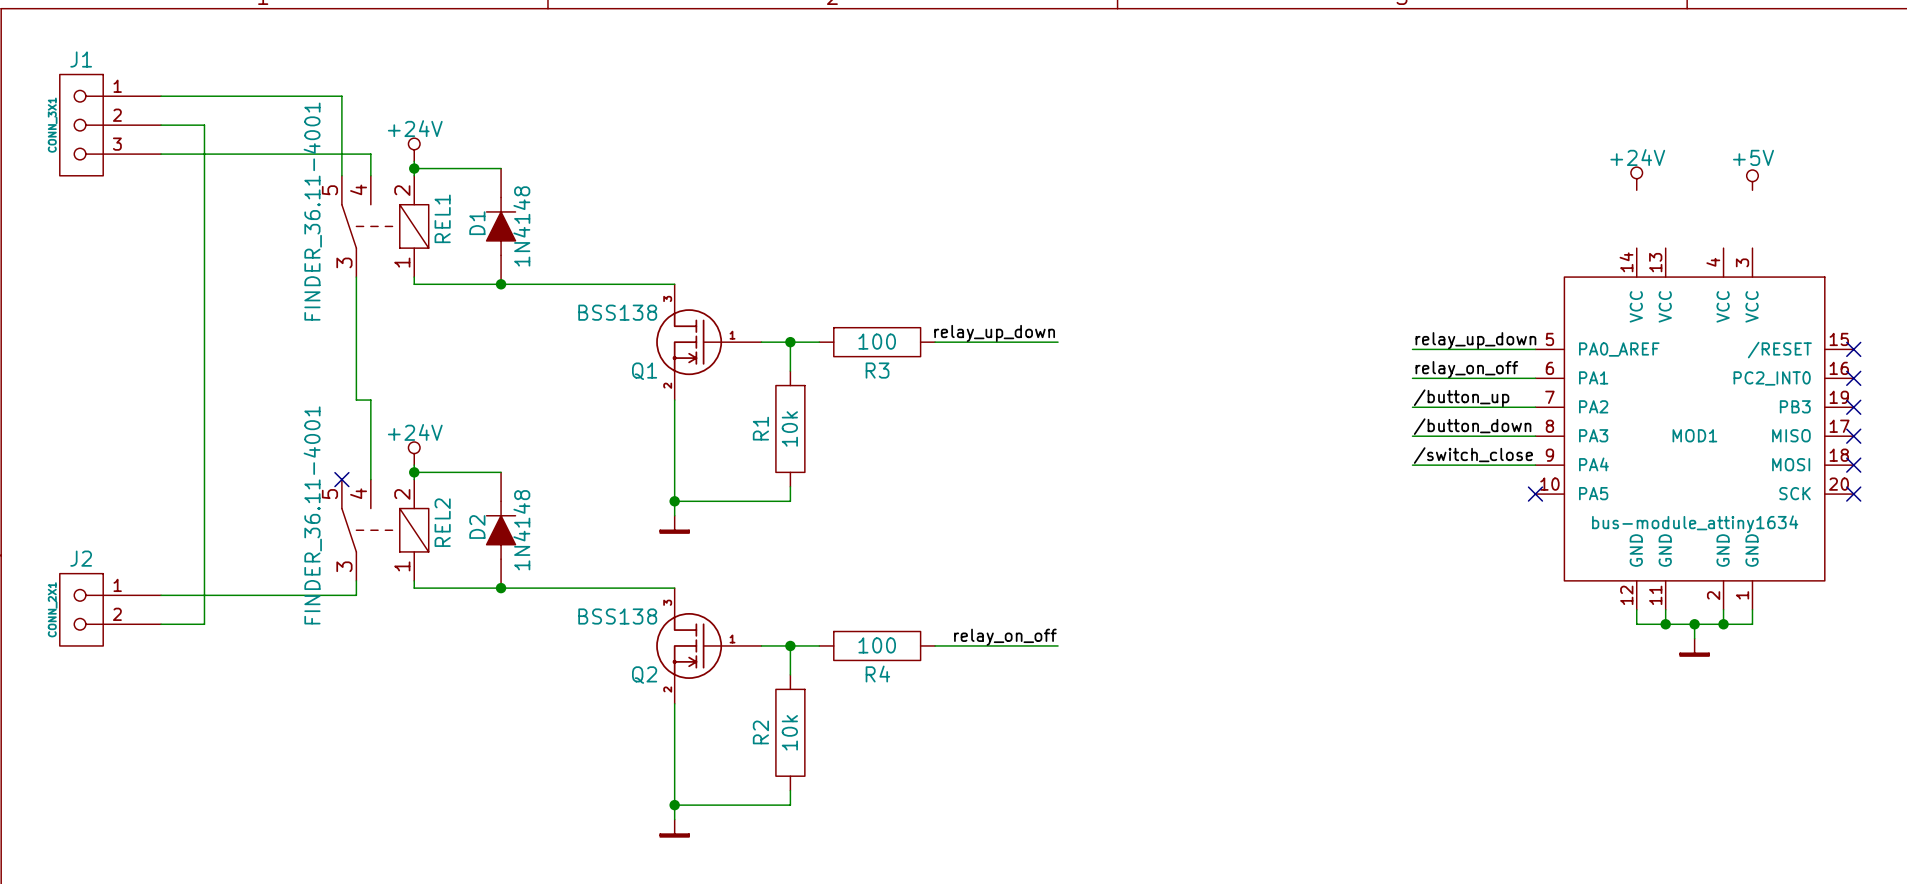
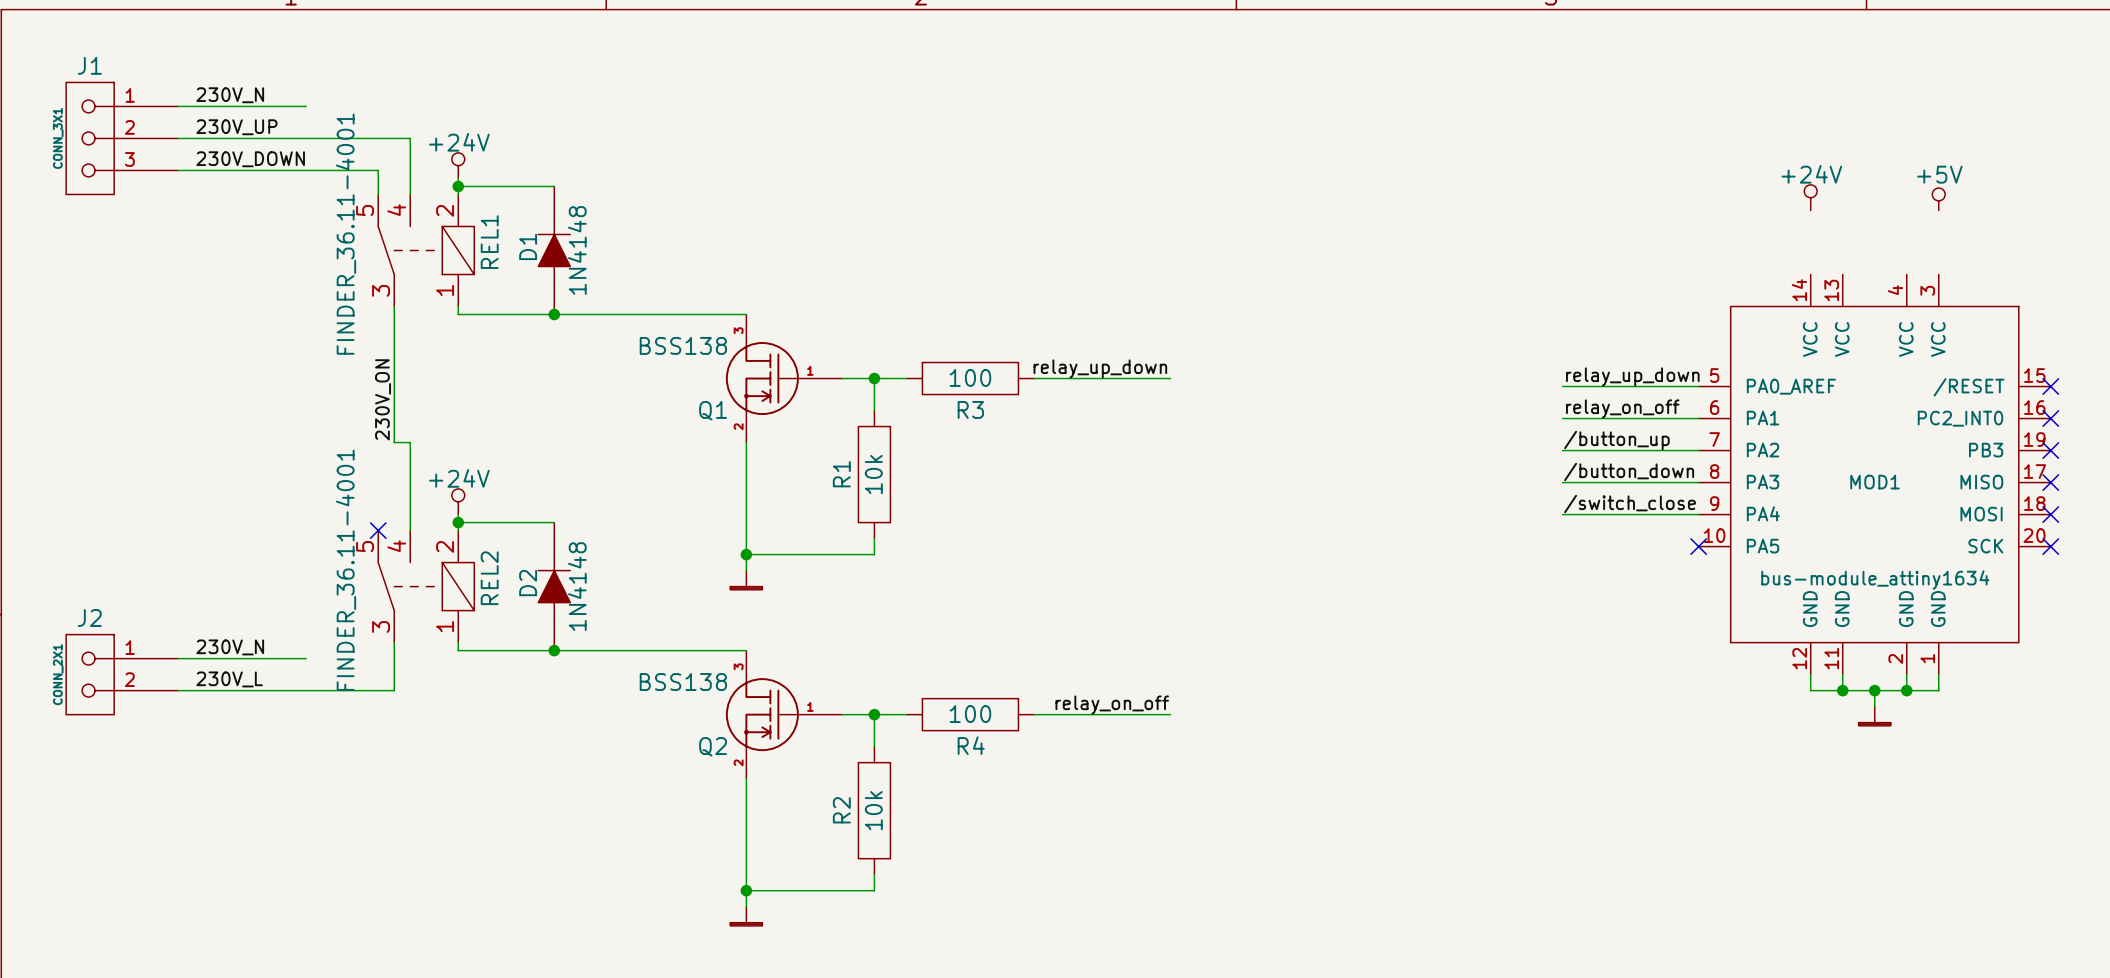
label: none -> 230V_N (230, 95)
wire: (276, 96) (341, 96) (341, 154) (370, 154) -> (226, 138) (410, 138) (410, 170)
label: none -> 230V_UP (236, 127)
wire: (204, 125) (204, 624) -> none
label: none -> 230V_DOWN (250, 159)
label: none -> 230V_ON (383, 399)
label: none -> 230V_N (230, 647)
wire: (276, 595) (356, 595) -> (226, 690) (394, 690) (394, 658)
label: none -> 230V_L (229, 679)

